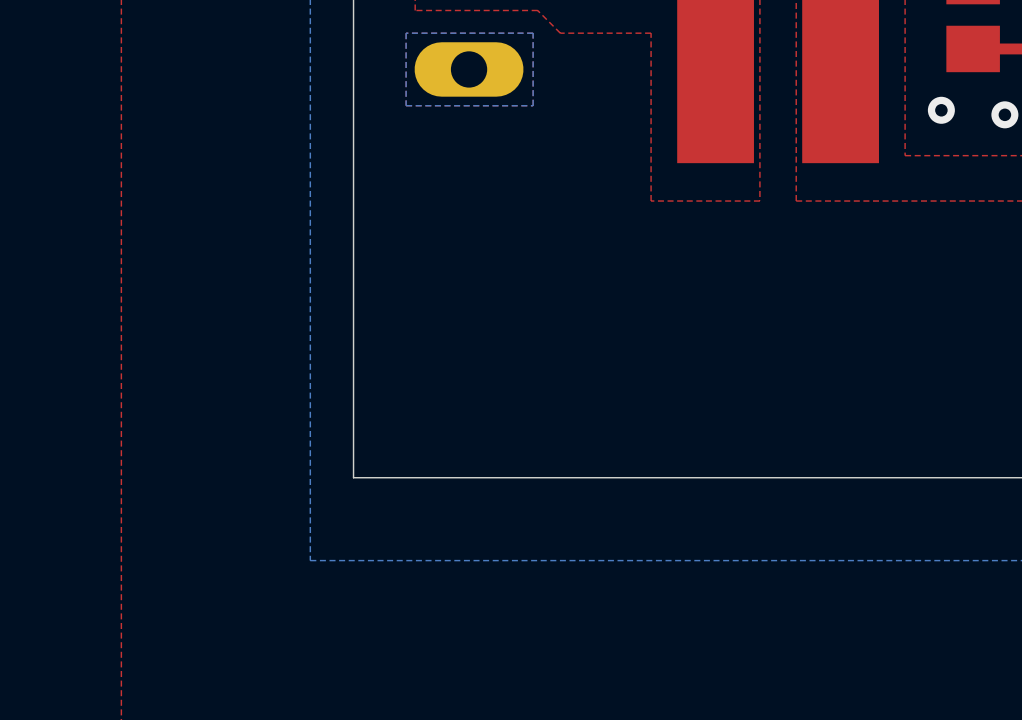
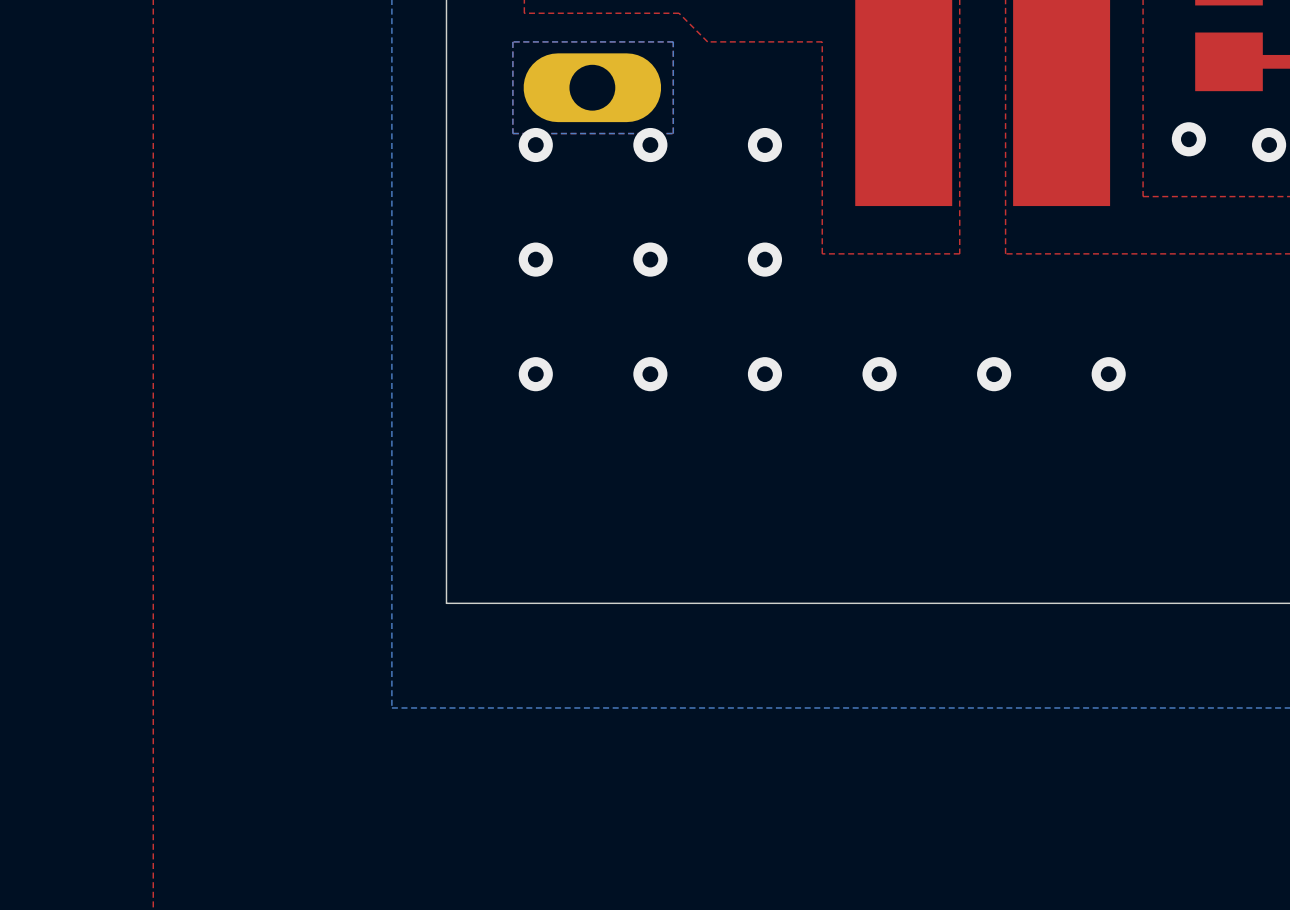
via: none -> (535, 145)
via: none -> (650, 145)
via: none -> (764, 145)
via: none -> (535, 259)
via: none -> (650, 259)
via: none -> (764, 259)
via: none -> (535, 374)
via: none -> (650, 374)
via: none -> (764, 374)
via: none -> (879, 374)
via: none -> (994, 374)
via: none -> (1108, 374)

